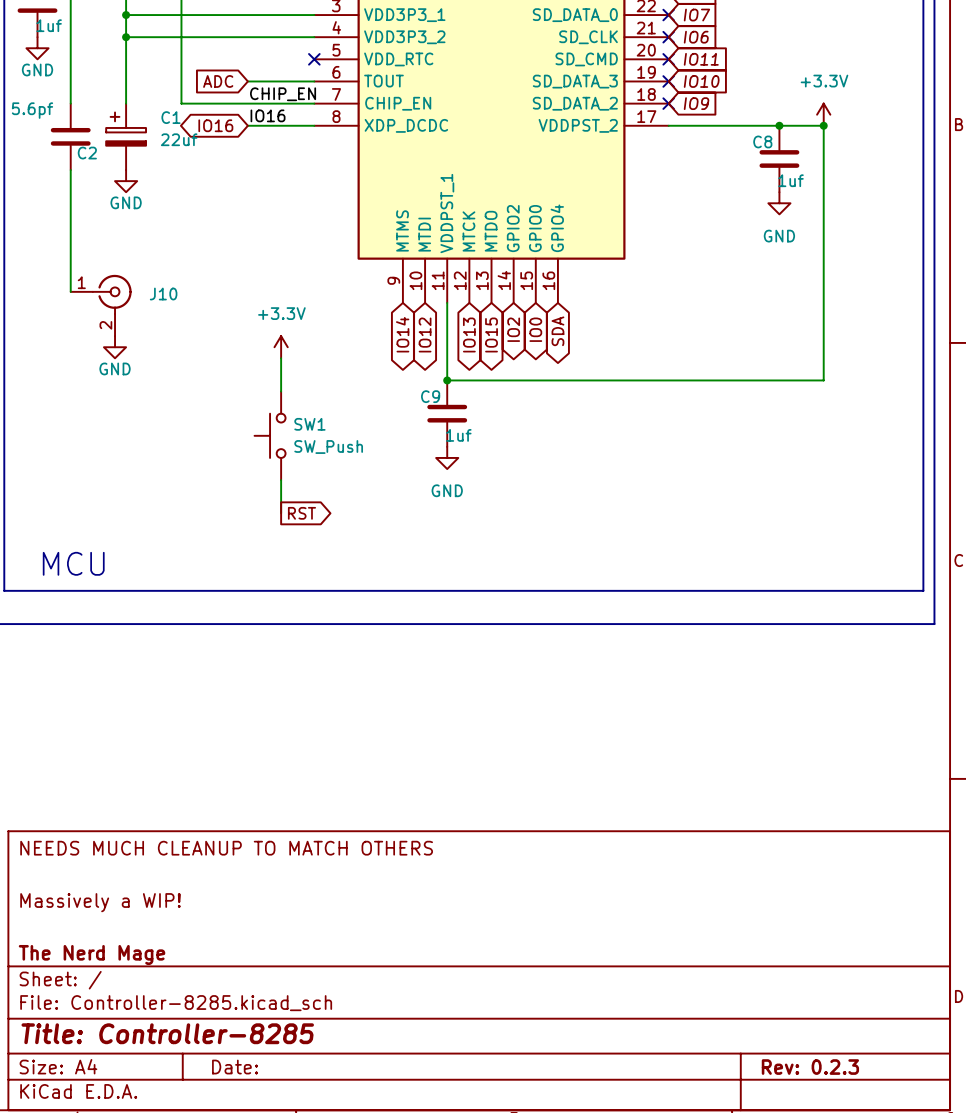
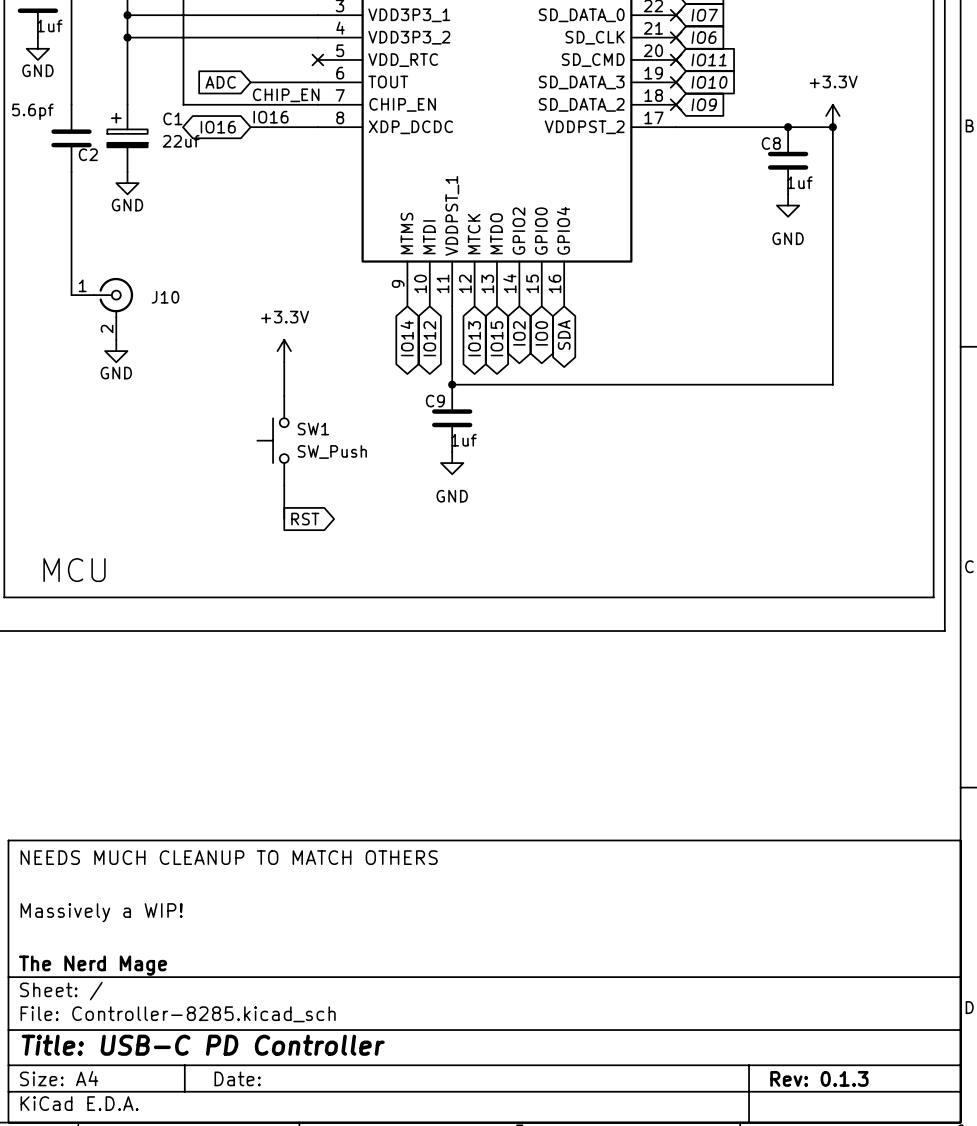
title block: Title: Controller-8285 (167, 1033) -> Title: USB-C PD Controller (203, 1045)
title block: Rev: 0.2.3 (810, 1067) -> Rev: 0.1.3 (819, 1078)

